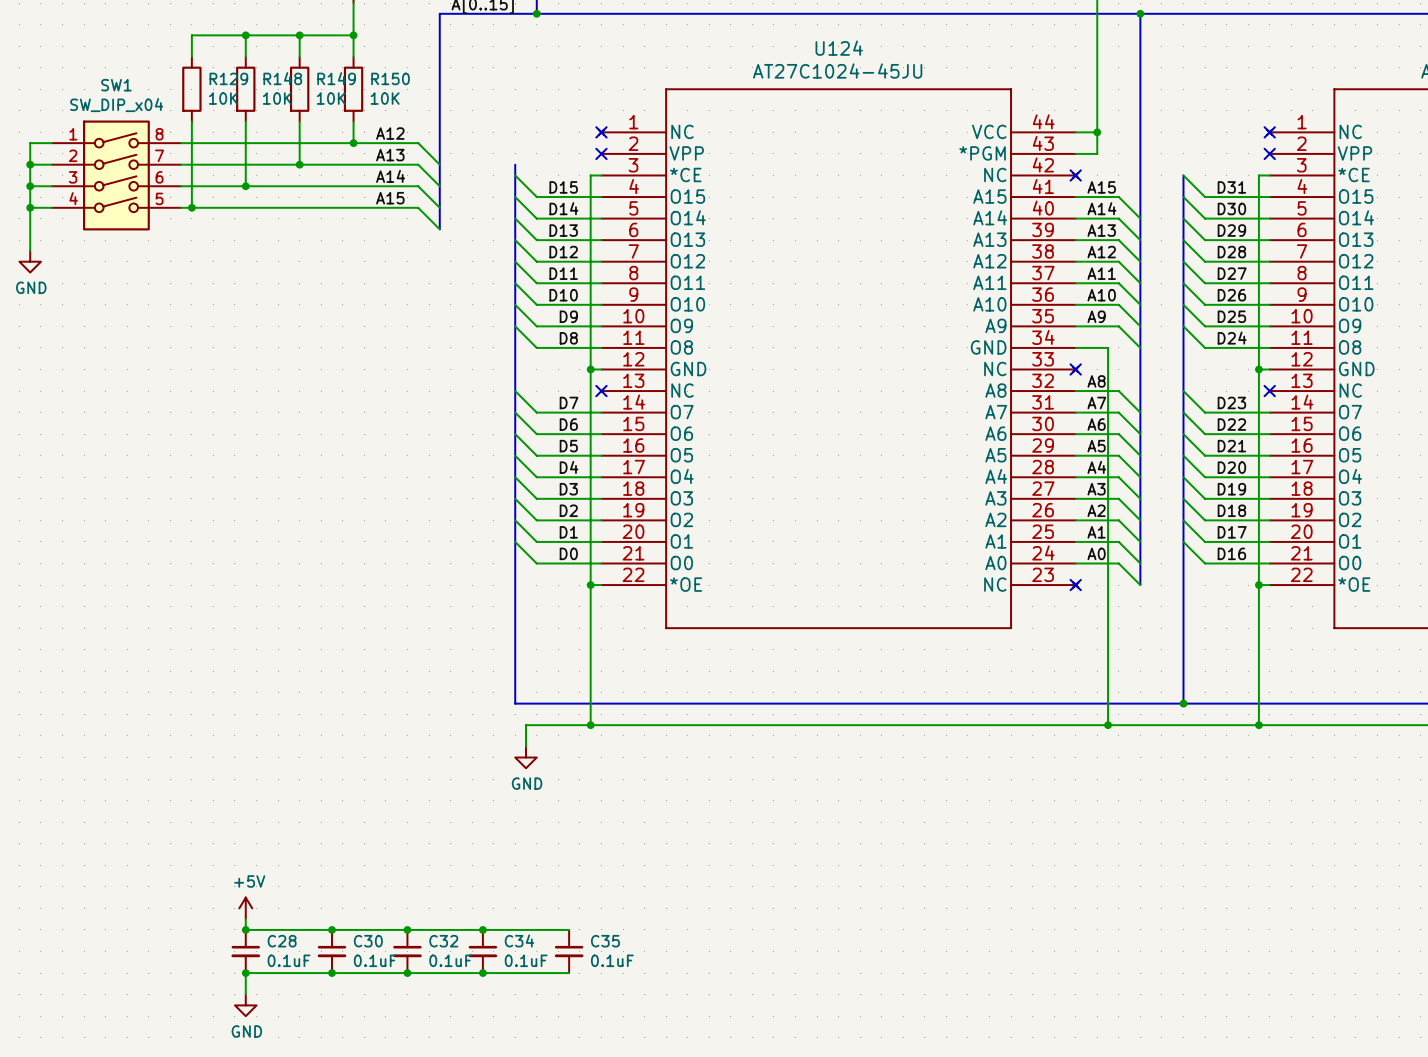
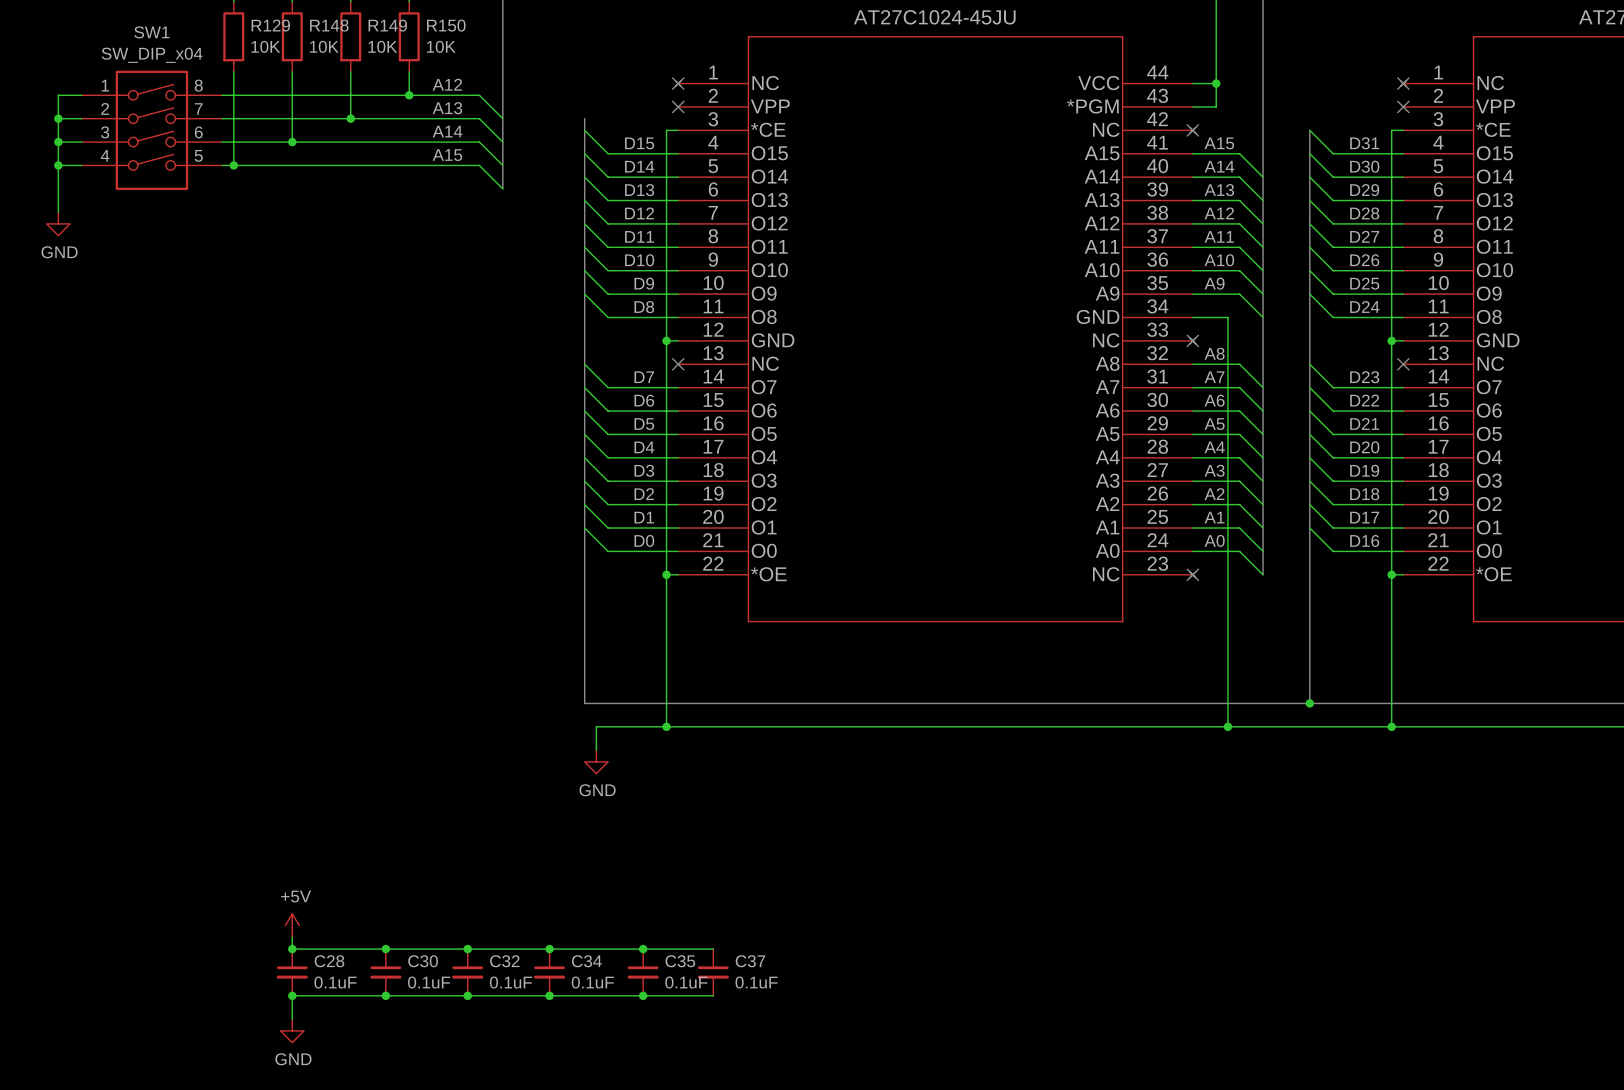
wire: none -> (643, 949) (713, 949)
junction: none -> (643, 949)
C37: none -> 0.1uF (713, 972)
wire: none -> (643, 995) (713, 995)
junction: none -> (643, 995)

